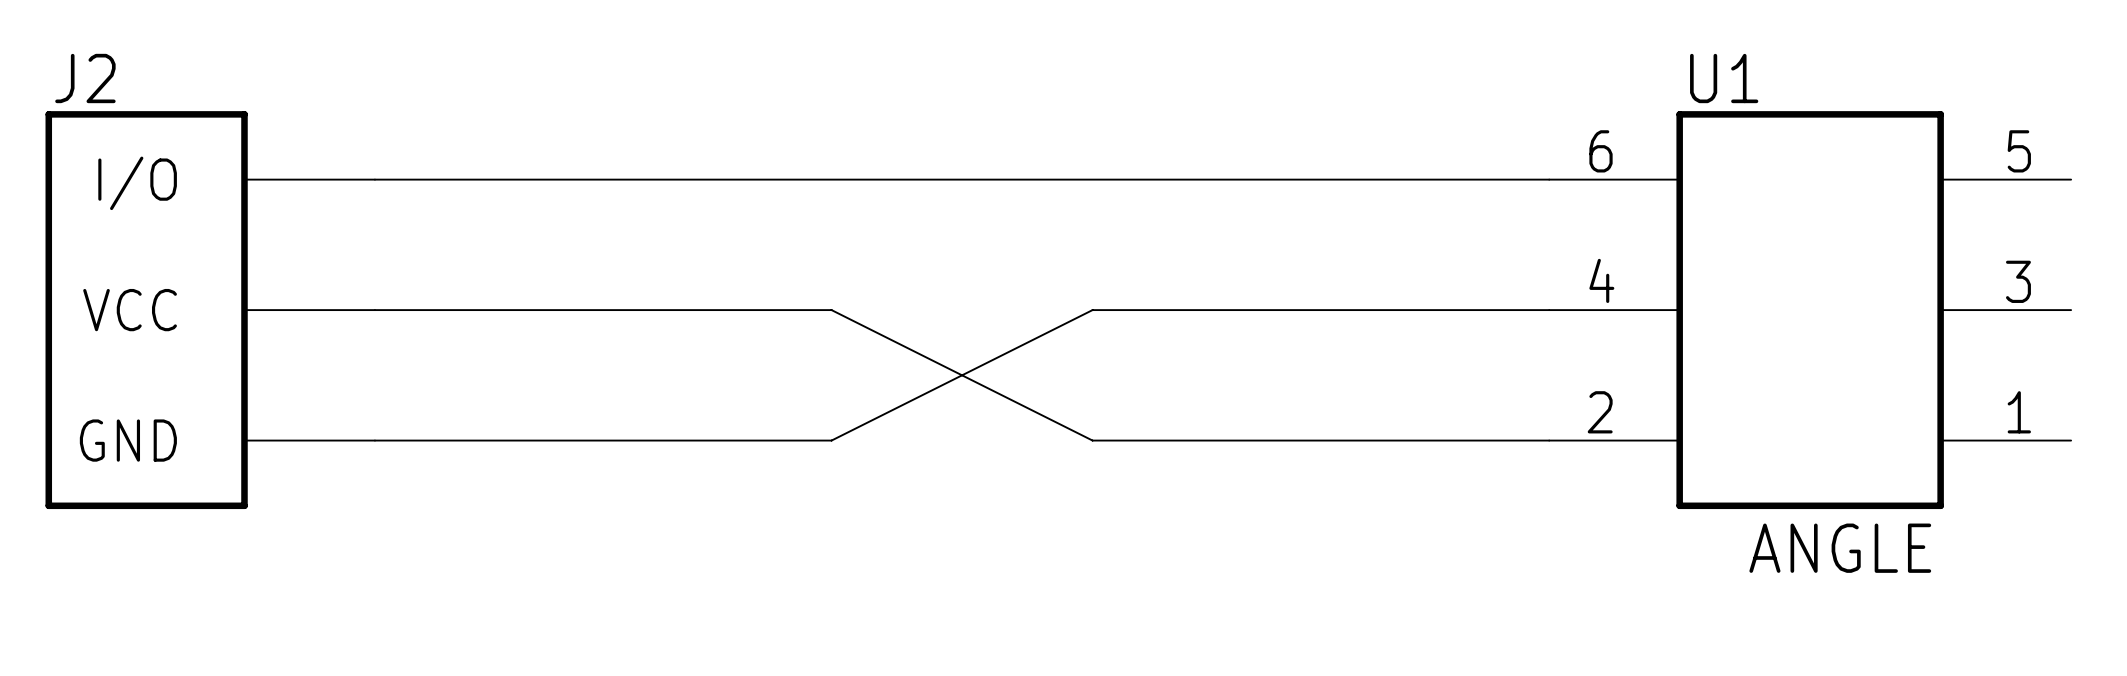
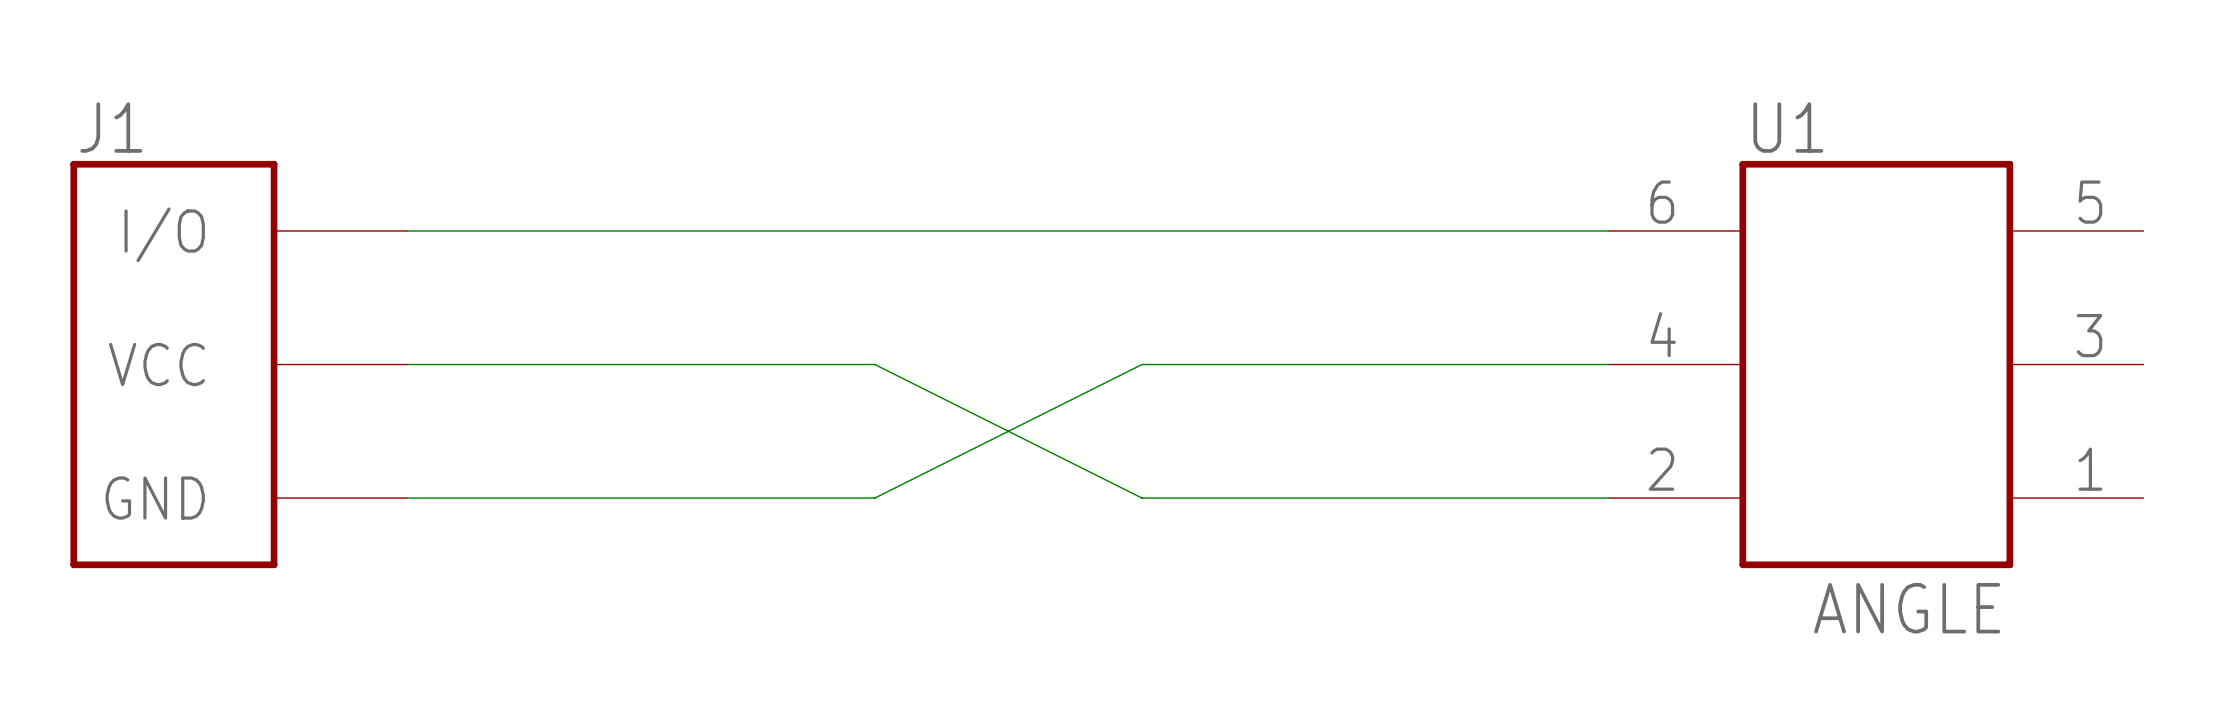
J2 name: J2 (85, 78) -> J1 (111, 127)

